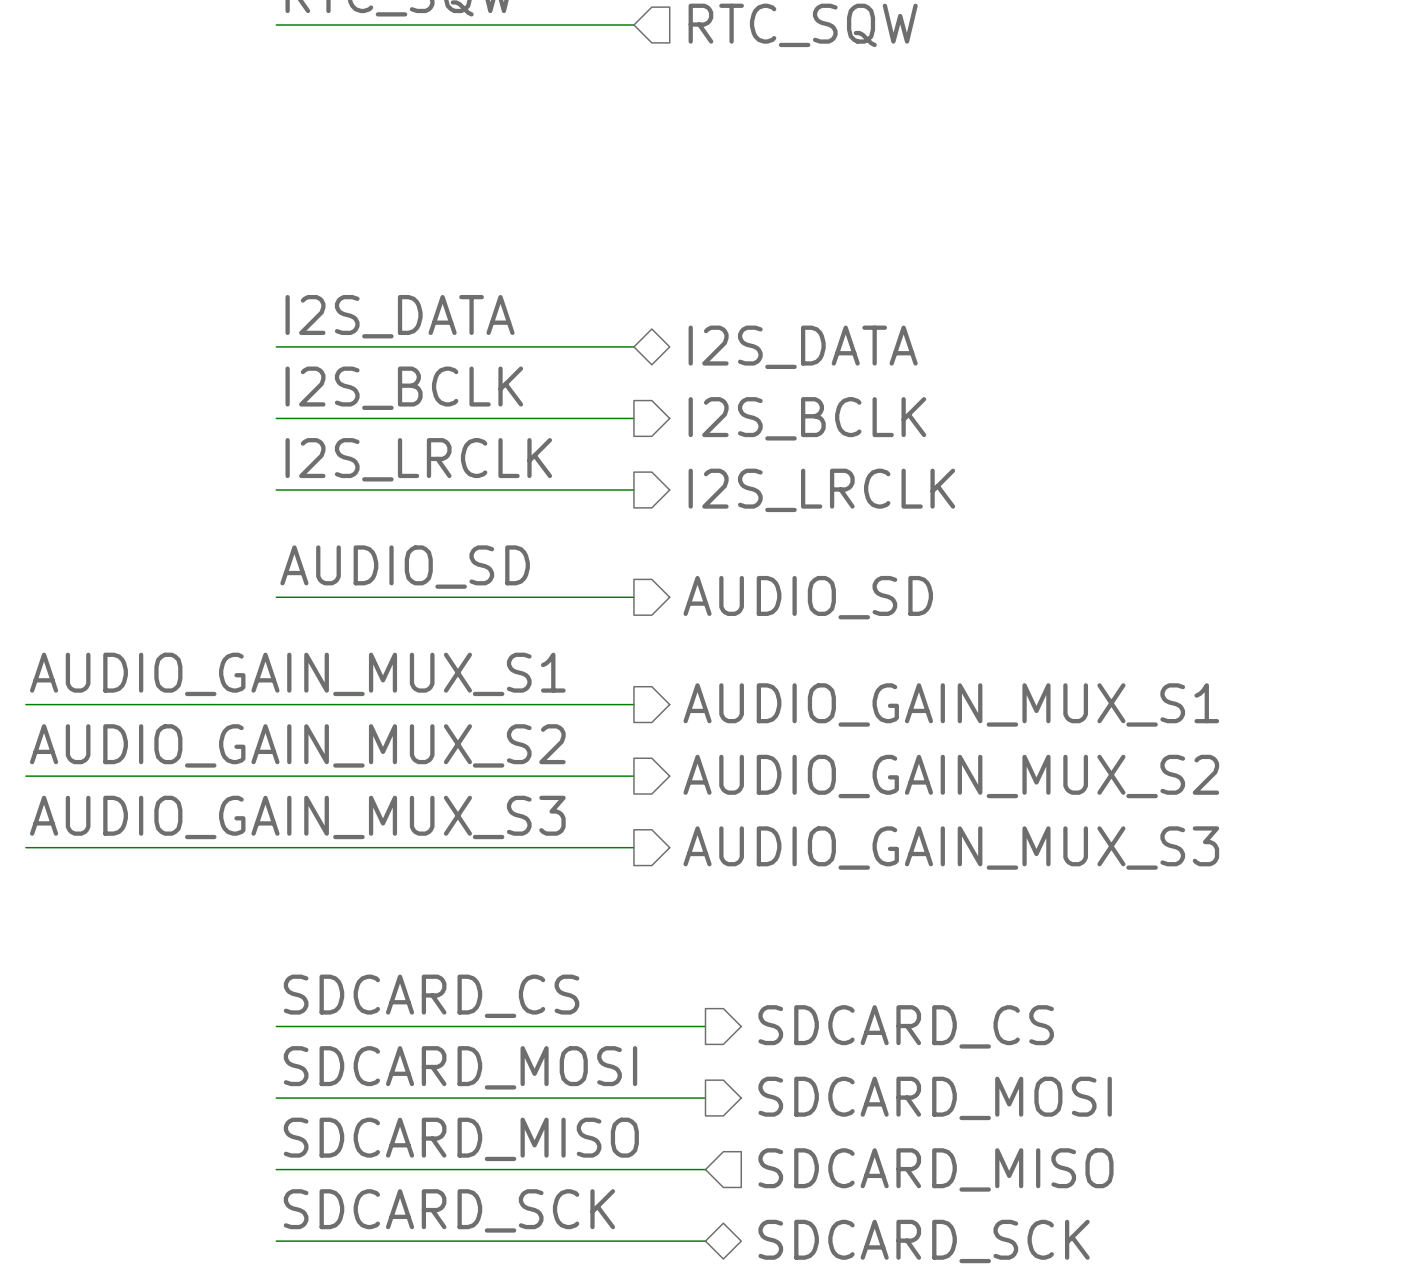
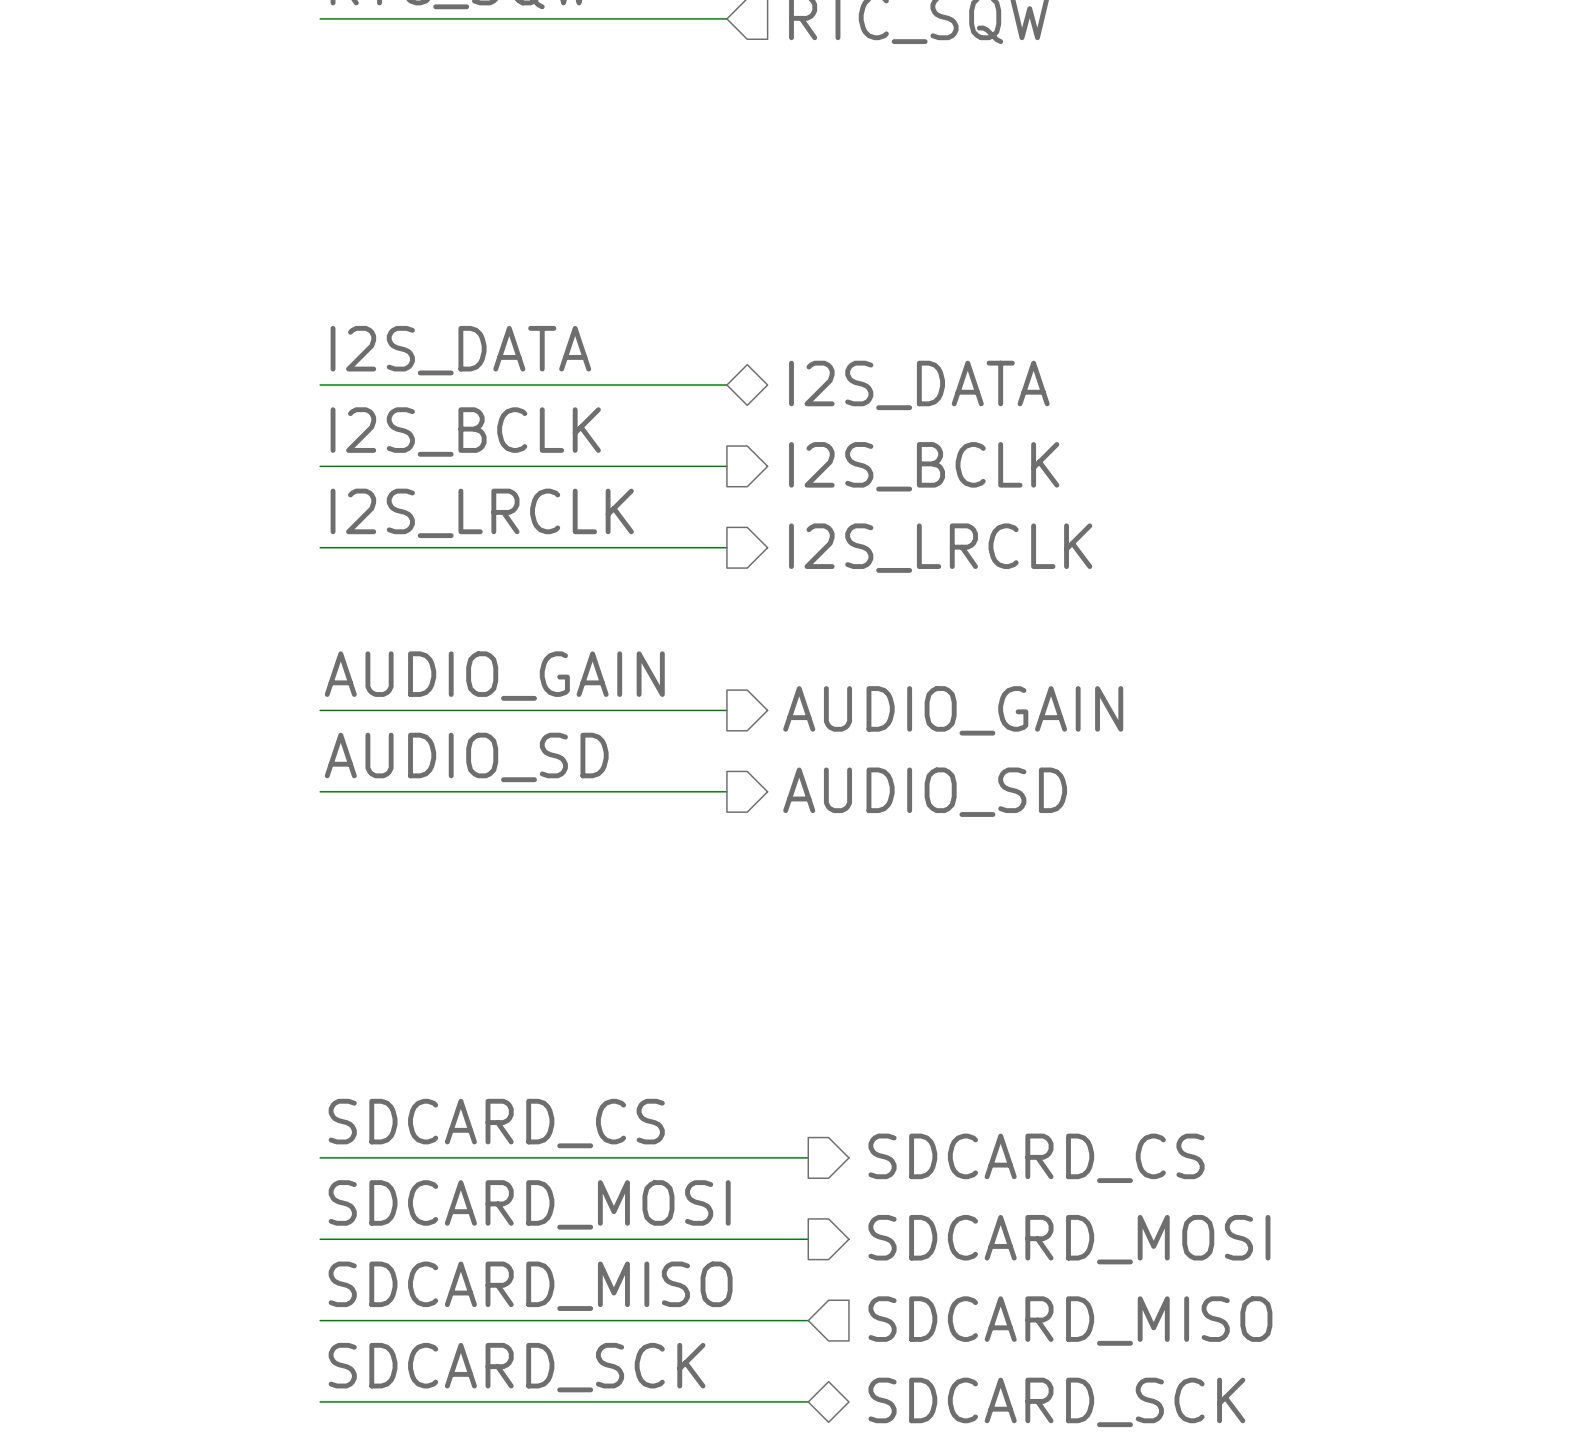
label position: AUDIO_SD (405, 567) -> AUDIO_SD (466, 757)
wire: (276, 597) (633, 597) -> (320, 710) (726, 710)
hierarchical label: AUDIO_SD (808, 597) -> AUDIO_GAIN (953, 710)
label: AUDIO_GAIN_MUX_S1 (297, 674) -> AUDIO_GAIN (494, 676)
wire: (25, 704) (276, 704) -> none
hierarchical label: AUDIO_GAIN_MUX_S1 (951, 704) -> AUDIO_SD (925, 792)
label: AUDIO_GAIN_MUX_S2 (297, 745) -> none
wire: (25, 776) (633, 776) -> none
hierarchical label: AUDIO_GAIN_MUX_S2 (951, 776) -> none
label: AUDIO_GAIN_MUX_S3 (297, 817) -> none
wire: (25, 847) (633, 847) -> none
hierarchical label: AUDIO_GAIN_MUX_S3 (951, 848) -> none

